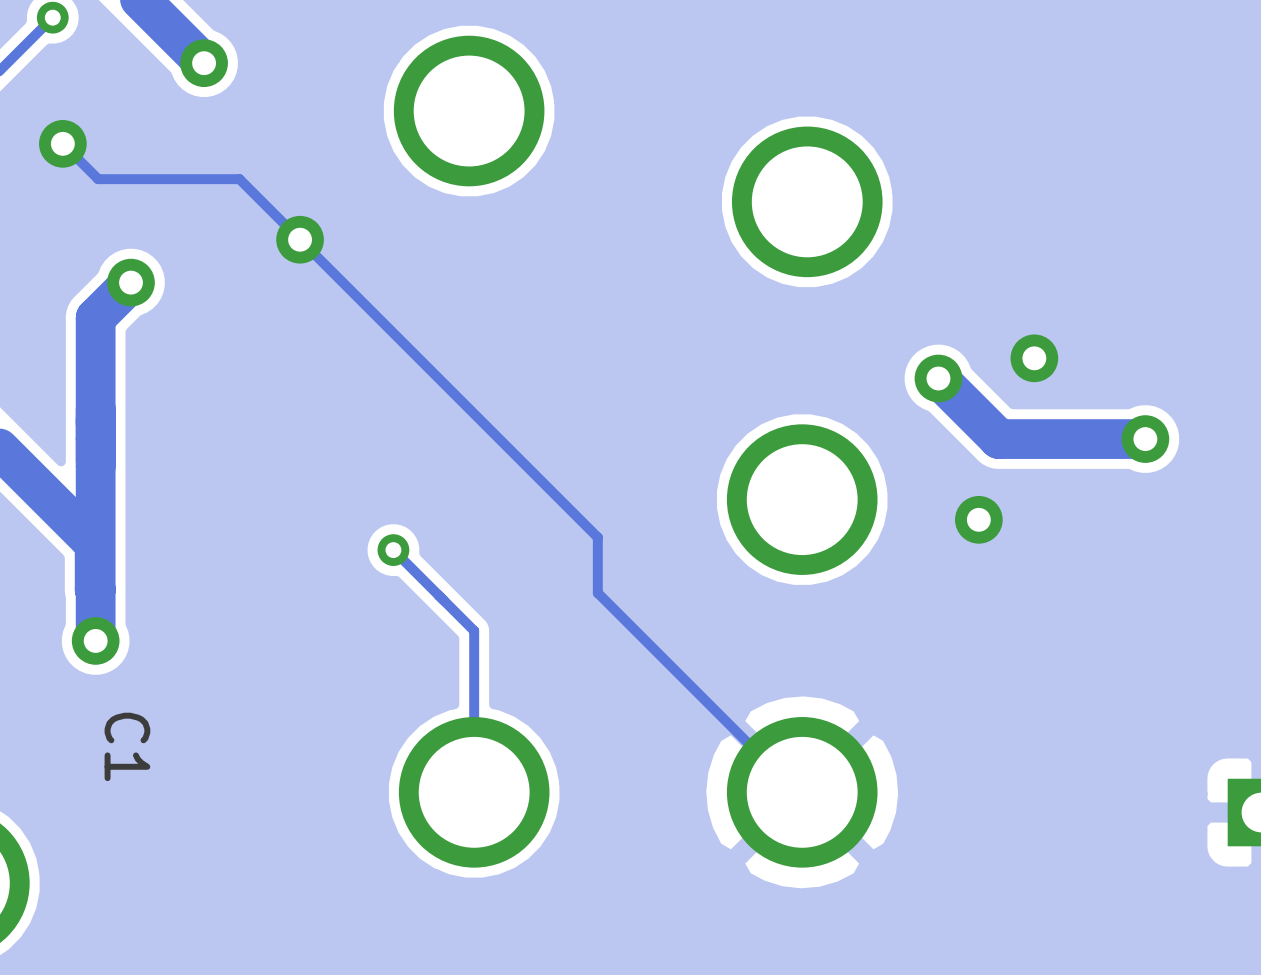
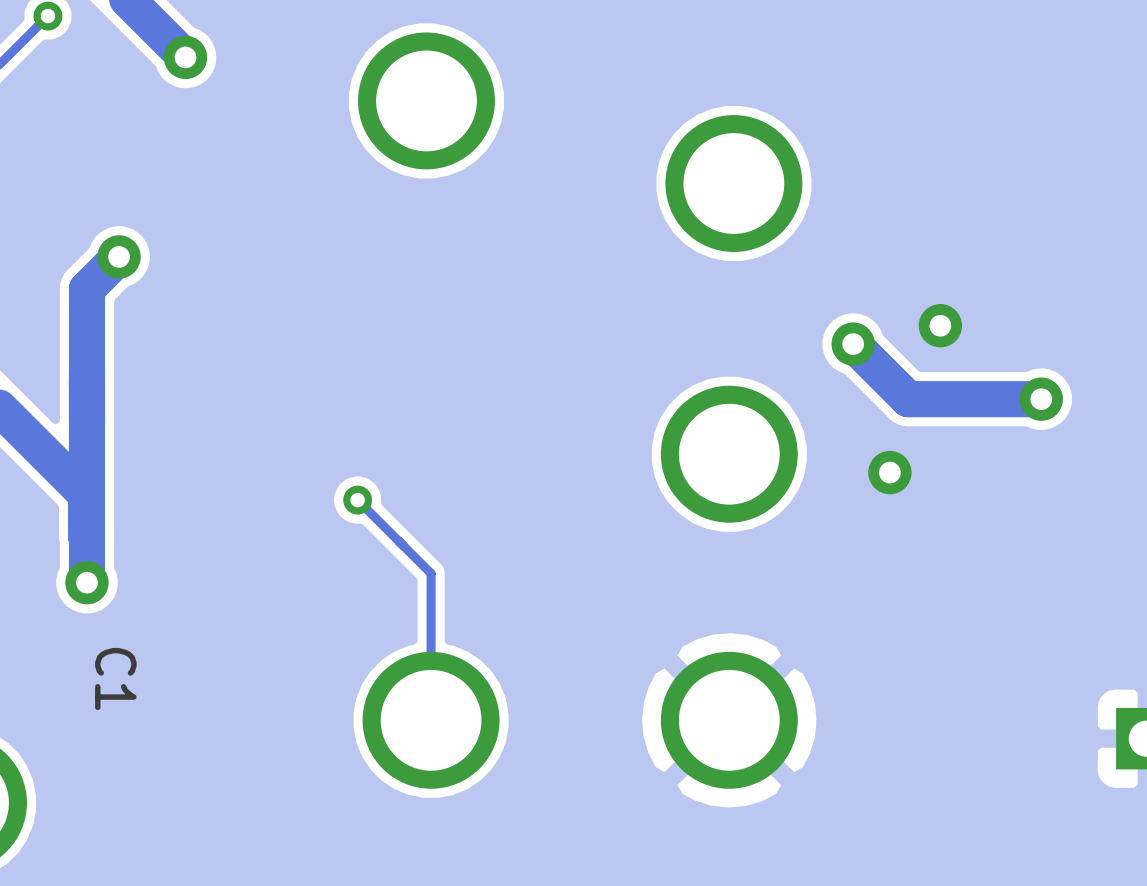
track: (62, 143) (98, 179) (239, 179) (597, 537) (597, 592) (797, 792) (802, 792) -> none
via: (62, 143) -> none
via: (300, 239) -> none

